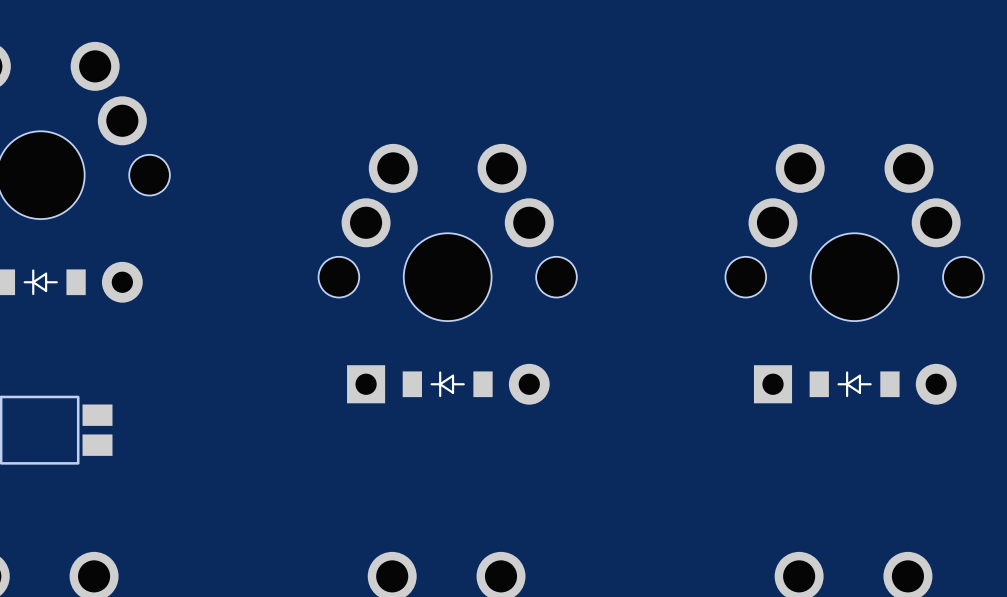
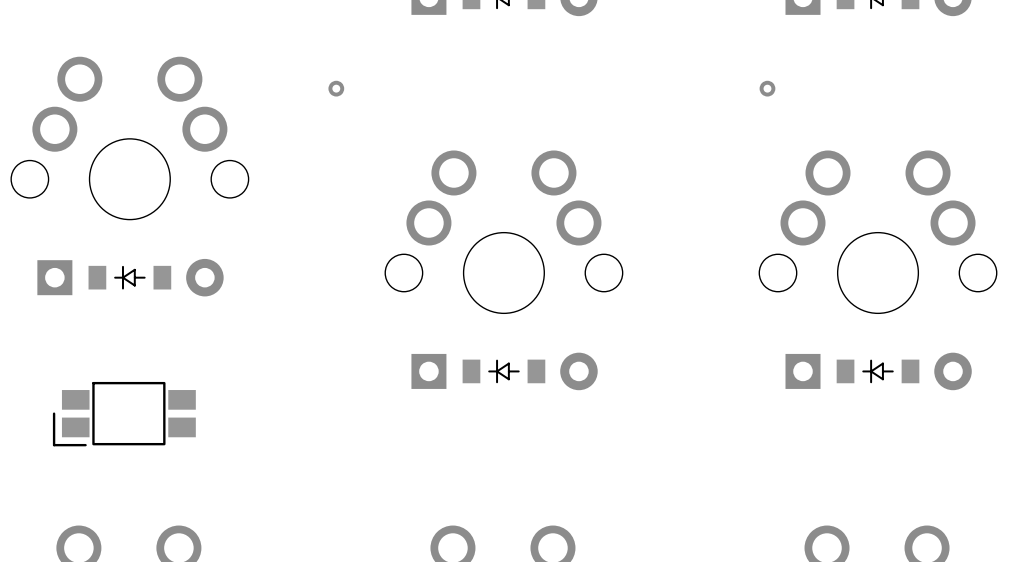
part: none -> (336, 88)
part: none -> (767, 88)

